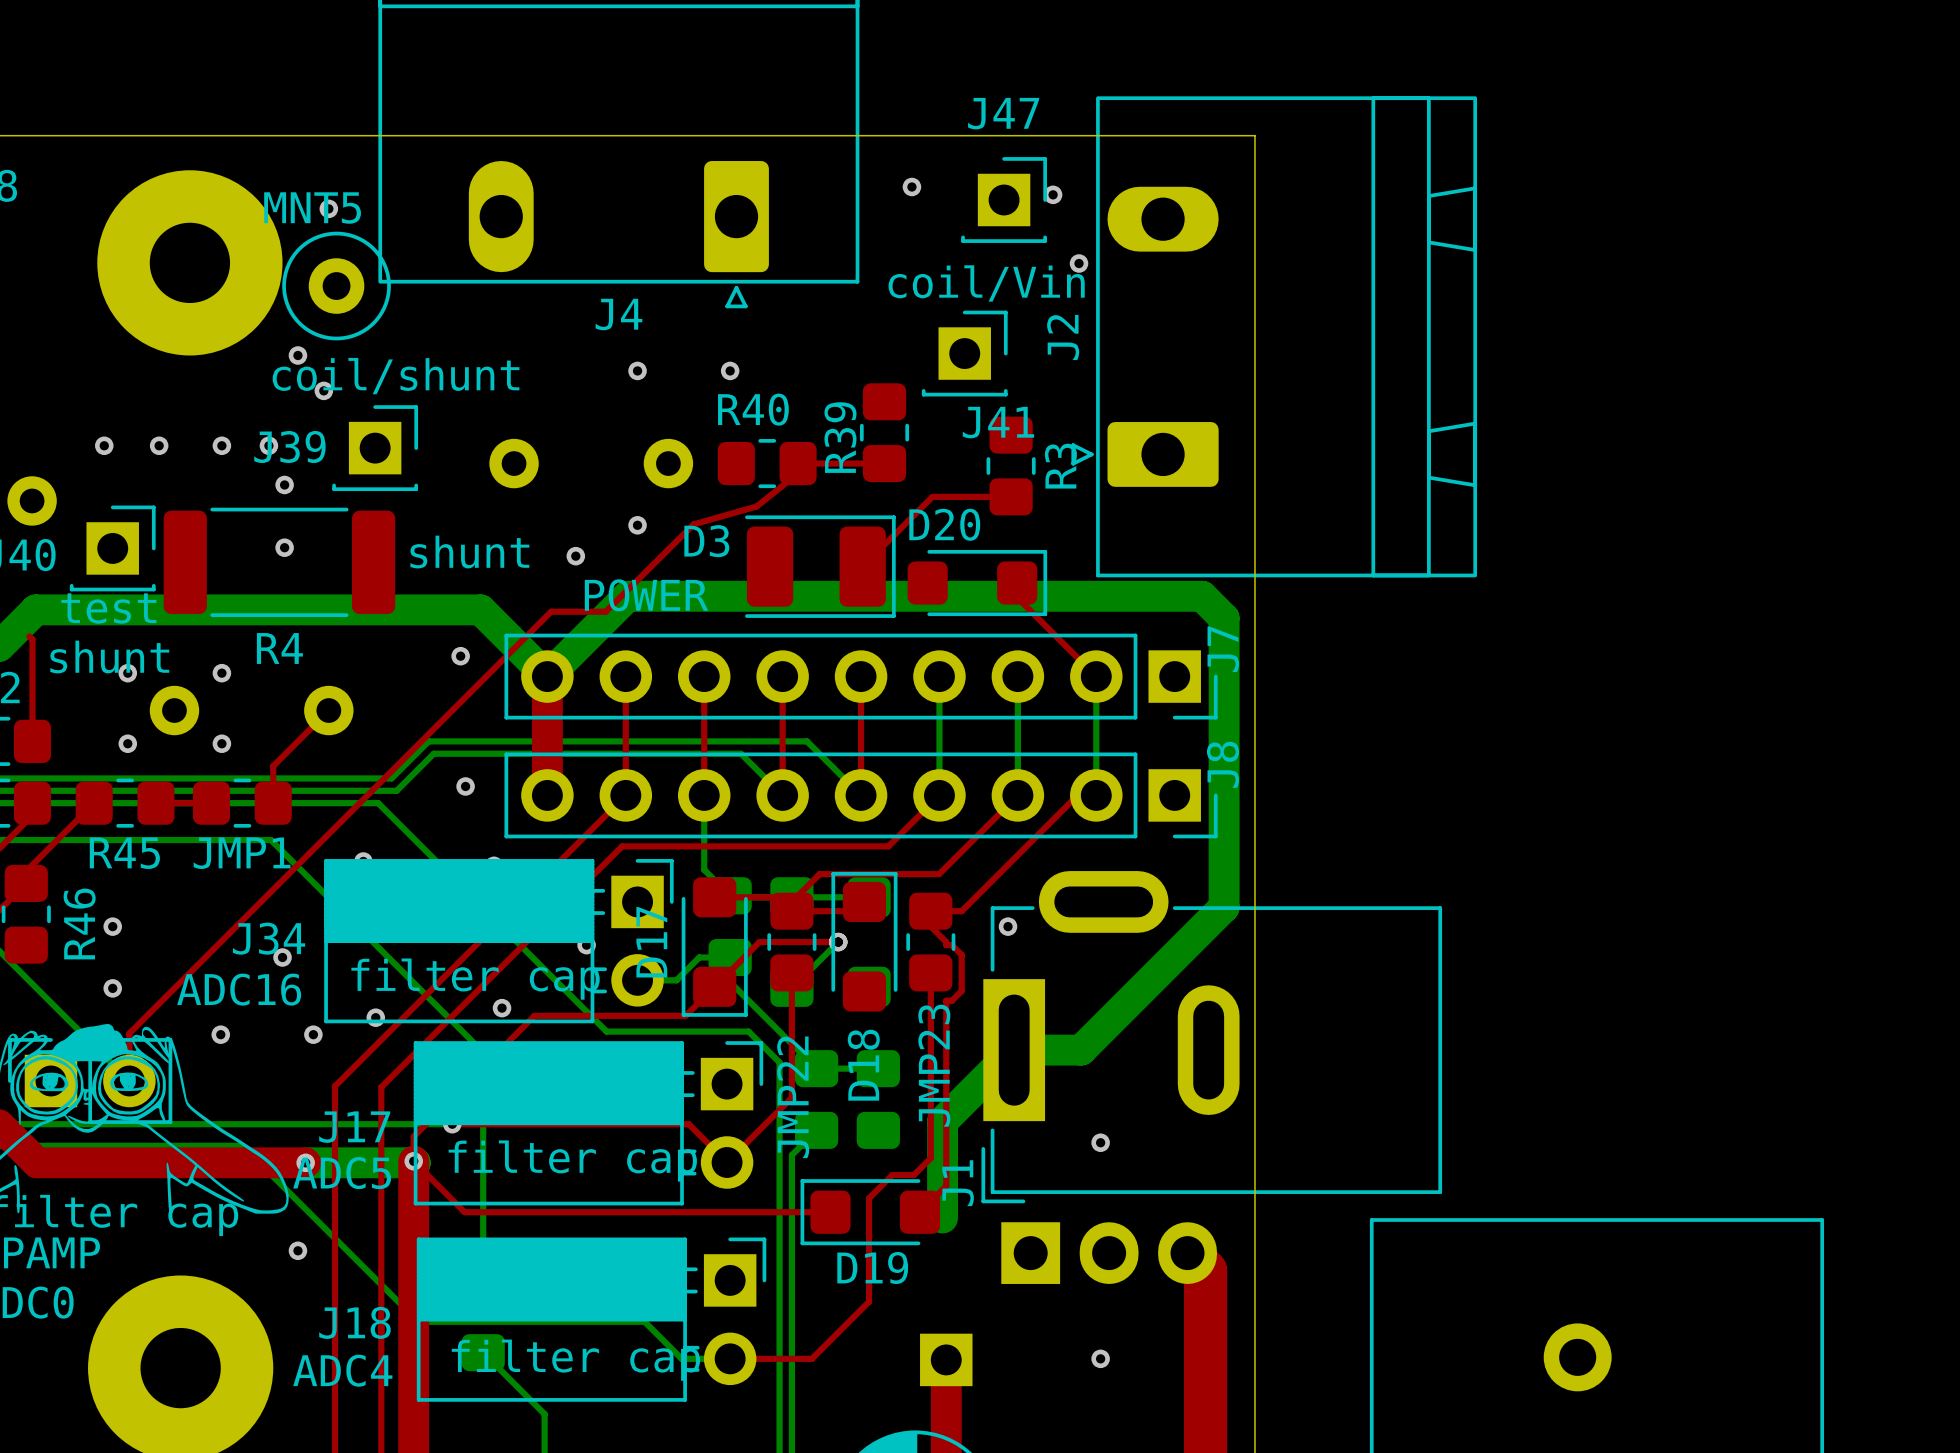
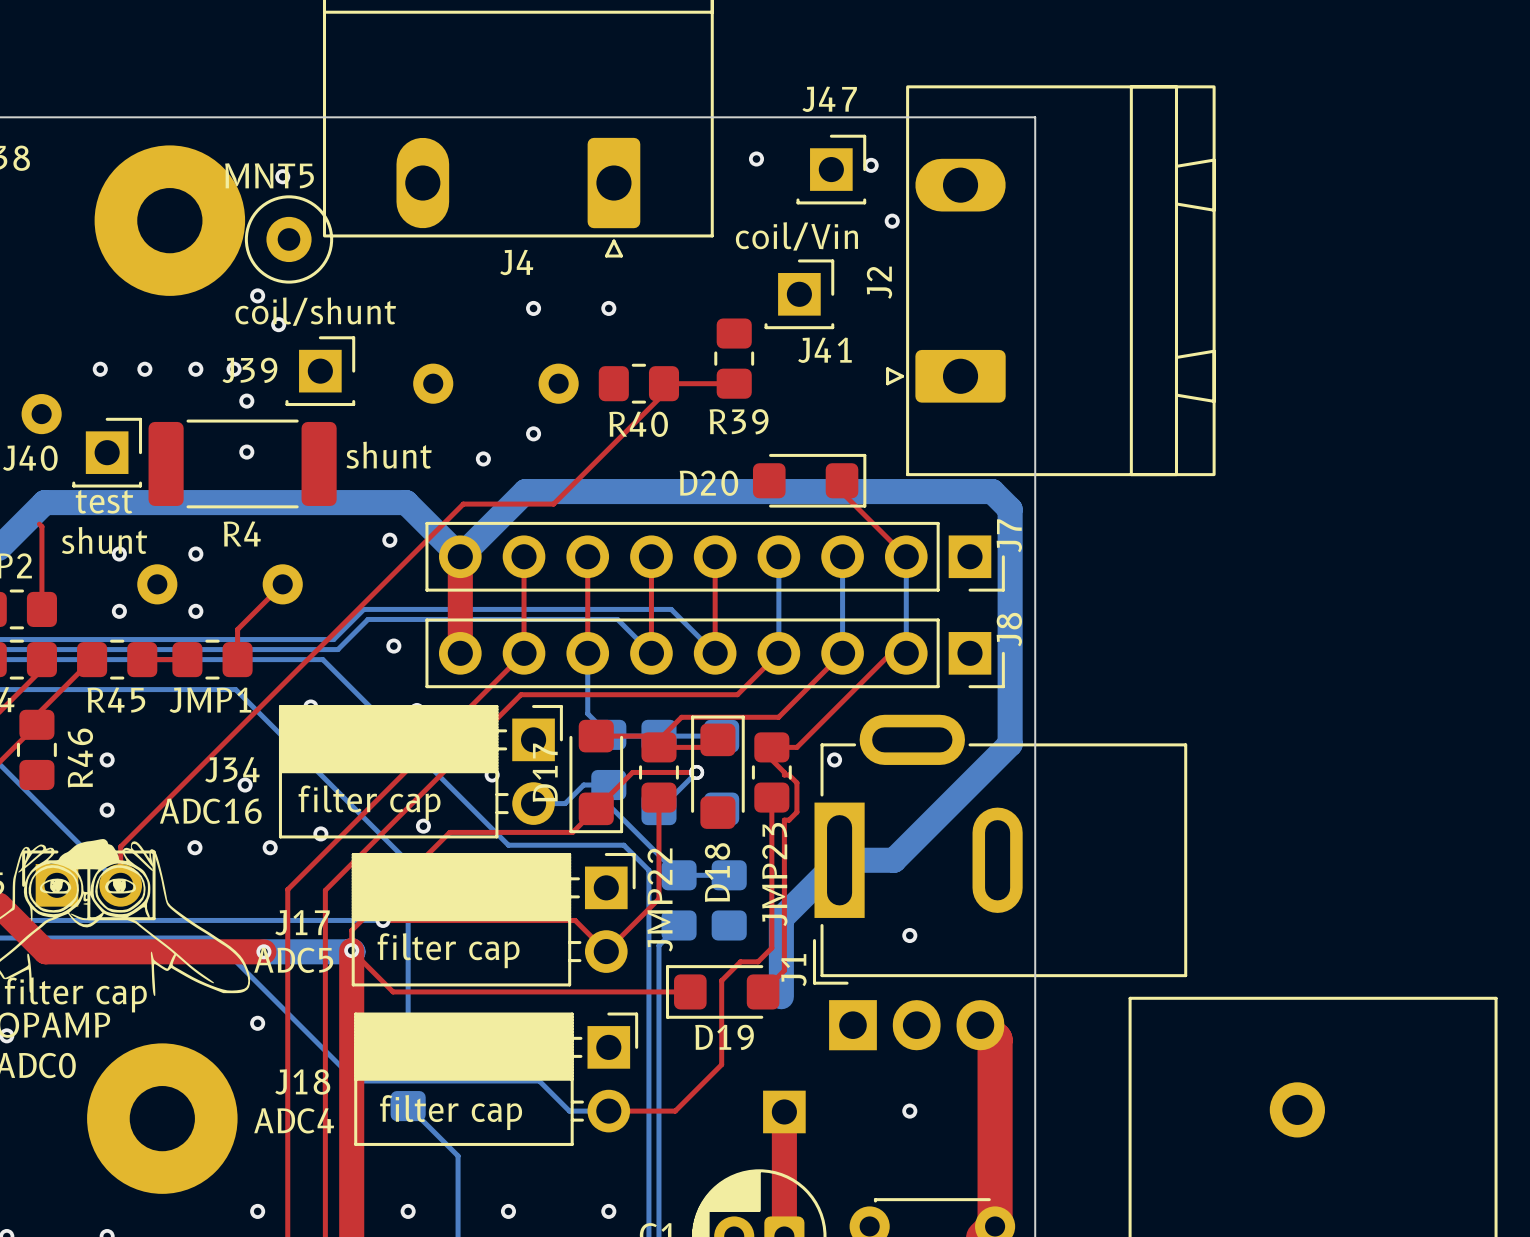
R40 name position: R40 (753, 409) -> R40 (638, 424)
R39 name rotation: 0° (840, 437) -> 90° clockwise (739, 421)
top track: (810, 463) (756, 506) (693, 524) (605, 611) -> (674, 383) (553, 504) (507, 504)
R3: (1011, 466) -> none
top track: (1011, 496) (932, 496) (862, 566) -> none
D20 name position: D20 (944, 524) -> D20 (708, 483)
D3: (820, 566) -> none
text: POWER (646, 595) -> none

